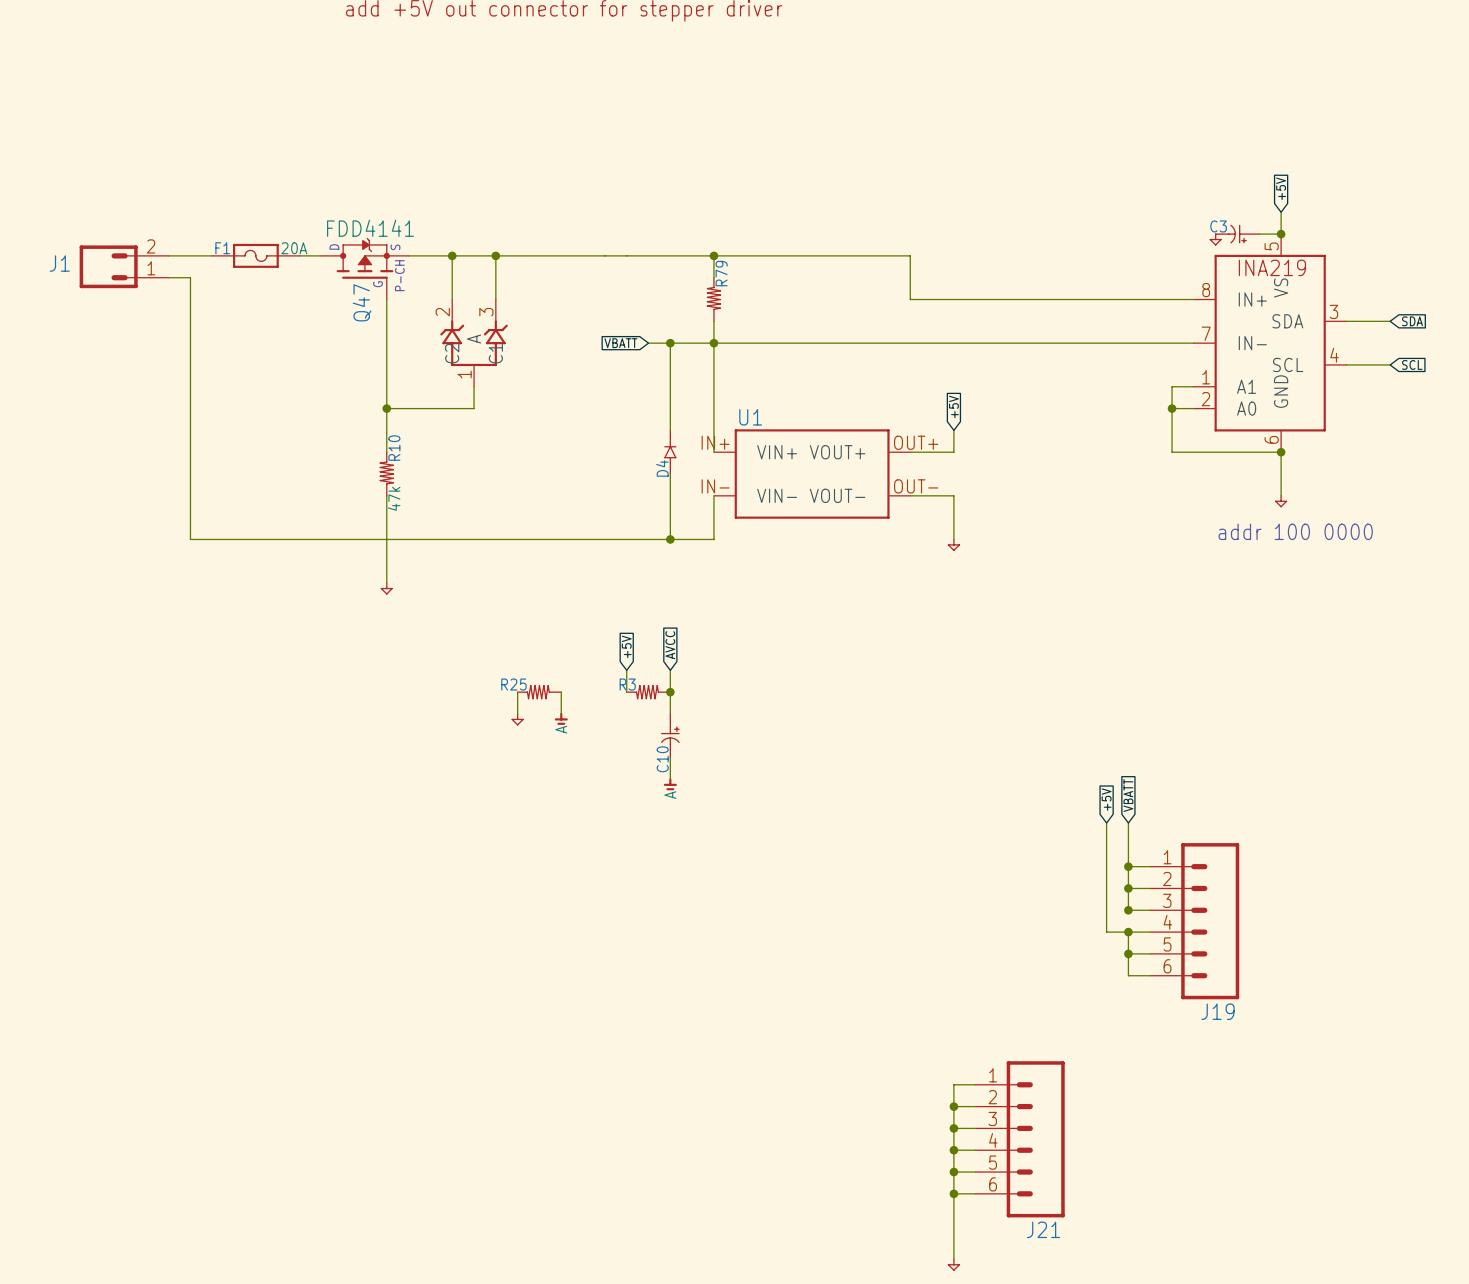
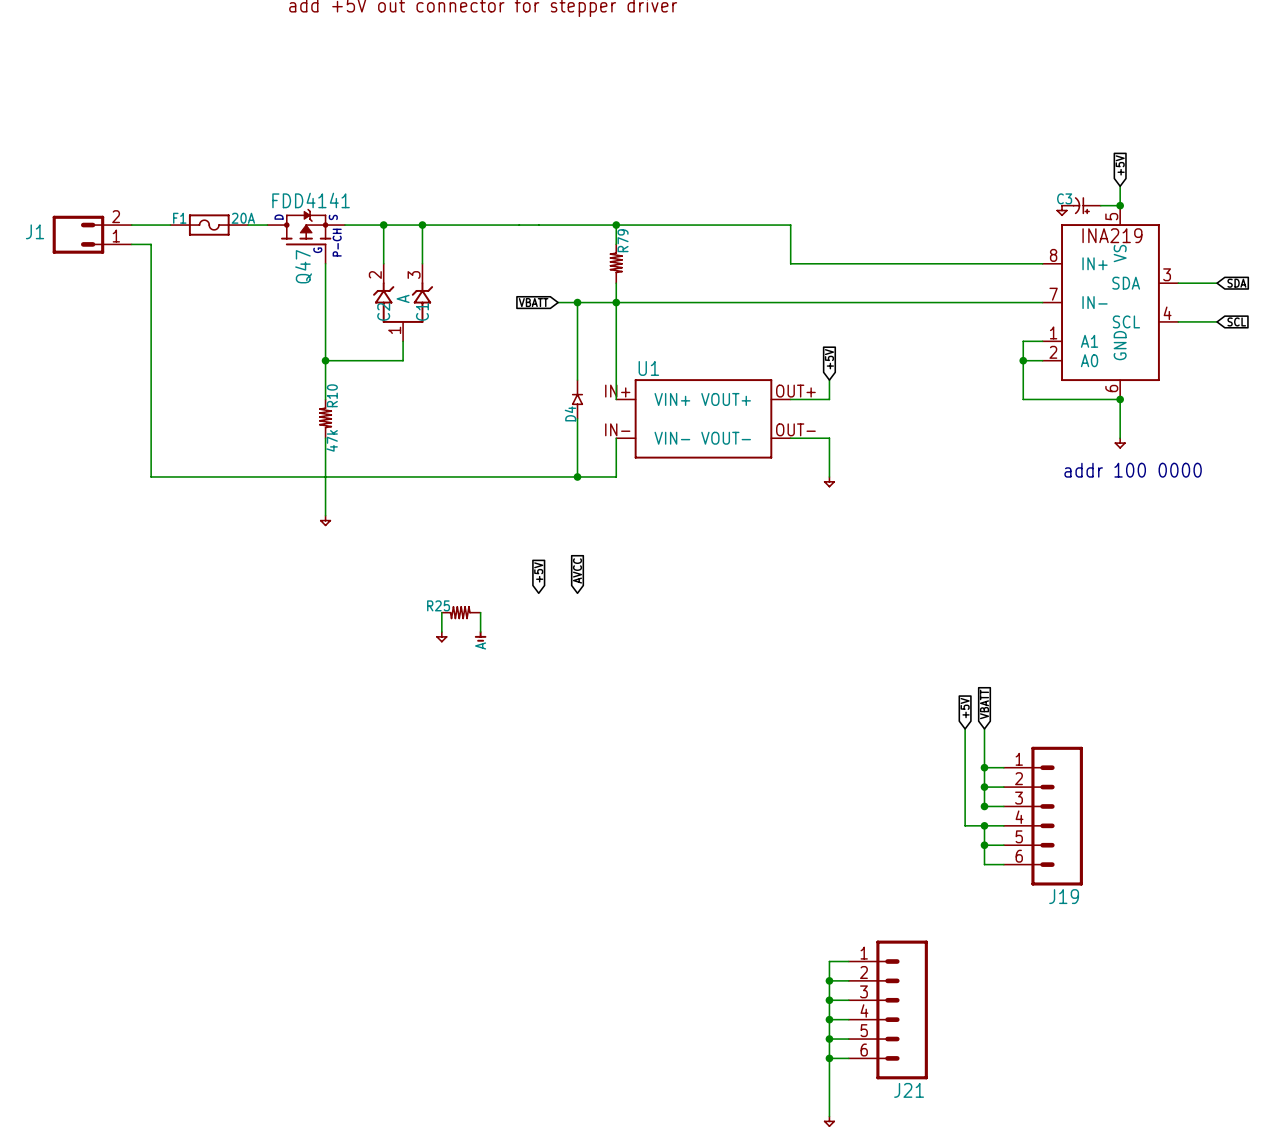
wire: (626, 670) (626, 692) -> none
wire: (670, 670) (670, 713) -> none
R3: (648, 692) -> none
junction: (670, 692) -> none
C10: (670, 735) -> none
wire: (670, 757) (670, 779) -> none
power symbol: (670, 784) -> none

